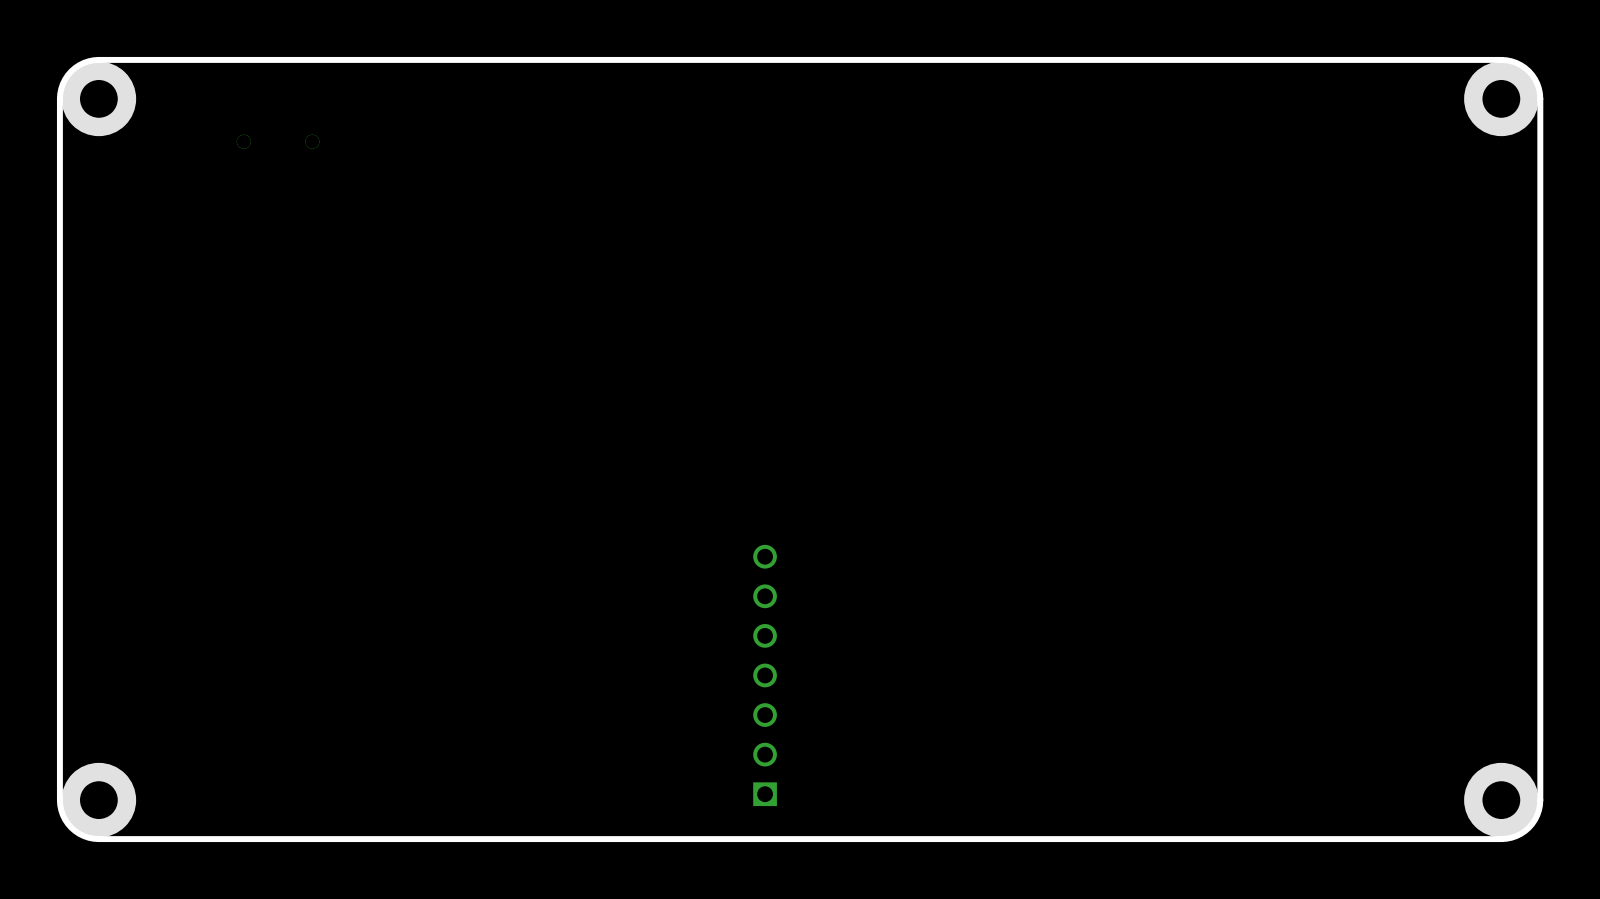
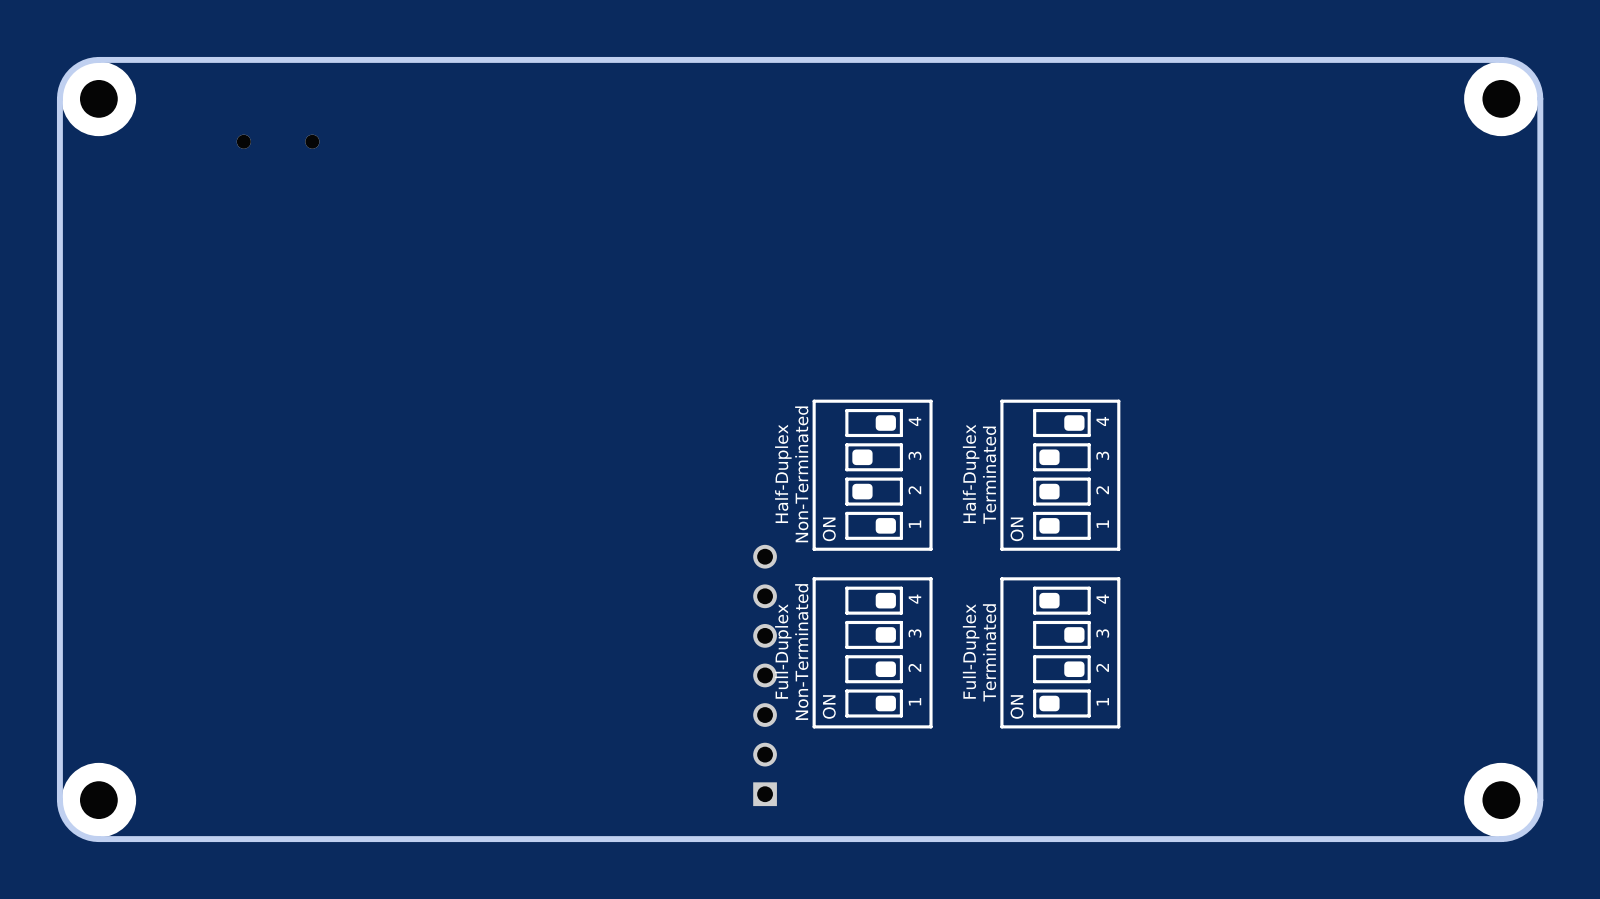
line: none -> (931, 401) (931, 549) (814, 549) (814, 401) (931, 401)
line: none -> (1118, 401) (1118, 549) (1001, 549) (1001, 401) (1118, 401)
line: none -> (901, 410) (901, 435) (846, 435) (846, 410) (901, 410)
line: none -> (1089, 410) (1089, 435) (1034, 435) (1034, 410) (1089, 410)
drawing: none -> [875, 415, 896, 431]
drawing: none -> [1064, 415, 1085, 431]
text: none -> 4 (914, 421)
text: none -> 4 (1102, 421)
line: none -> (901, 444) (901, 469) (846, 469) (846, 444) (901, 444)
line: none -> (1089, 444) (1089, 469) (1034, 469) (1034, 444) (1089, 444)
drawing: none -> [852, 449, 873, 466]
drawing: none -> [1039, 449, 1060, 466]
text: none -> 3 (914, 455)
text: none -> 3 (1102, 455)
text: none -> Half-Duplex (783, 473)
text: none -> Half-Duplex (971, 473)
text: none -> Non-Terminated (801, 474)
text: none -> Terminated (989, 475)
line: none -> (901, 479) (901, 504) (846, 504) (846, 479) (901, 479)
line: none -> (1089, 479) (1089, 504) (1034, 504) (1034, 479) (1089, 479)
drawing: none -> [852, 483, 873, 500]
drawing: none -> [1039, 483, 1060, 500]
text: none -> 2 (914, 490)
text: none -> 2 (1102, 490)
line: none -> (901, 513) (901, 538) (846, 538) (846, 513) (901, 513)
line: none -> (1089, 513) (1089, 538) (1034, 538) (1034, 513) (1089, 513)
drawing: none -> [875, 518, 896, 534]
drawing: none -> [1039, 518, 1060, 534]
text: none -> 1 (914, 524)
text: none -> 1 (1102, 524)
text: none -> ON (829, 529)
text: none -> ON (1017, 529)
line: none -> (931, 578) (814, 578) (814, 726) (931, 726) (931, 578)
line: none -> (1118, 578) (1118, 726) (1001, 726) (1001, 578) (1118, 578)
line: none -> (901, 588) (846, 588) (846, 613) (901, 613) (901, 588)
line: none -> (1089, 588) (1089, 613) (1034, 613) (1034, 588) (1089, 588)
drawing: none -> [875, 592, 896, 609]
drawing: none -> [1039, 592, 1060, 609]
text: none -> 4 (914, 599)
text: none -> 4 (1102, 599)
line: none -> (901, 622) (846, 622) (846, 647) (901, 647) (901, 622)
line: none -> (1089, 622) (1089, 647) (1034, 647) (1034, 622) (1089, 622)
drawing: none -> [875, 627, 896, 678]
drawing: none -> [1064, 627, 1085, 678]
text: none -> 3 (914, 633)
text: none -> 3 (1102, 633)
text: none -> Full-Duplex (783, 651)
text: none -> Full-Duplex (971, 651)
text: none -> Non-Terminated (801, 652)
text: none -> Terminated (989, 652)
line: none -> (901, 656) (846, 656) (846, 681) (901, 681) (901, 656)
line: none -> (1089, 656) (1089, 681) (1034, 681) (1034, 656) (1089, 656)
text: none -> 2 (914, 667)
text: none -> 2 (1102, 667)
line: none -> (901, 691) (846, 691) (846, 715) (901, 715) (901, 691)
line: none -> (1089, 691) (1089, 715) (1034, 715) (1034, 691) (1089, 691)
drawing: none -> [875, 695, 896, 712]
drawing: none -> [1039, 695, 1060, 712]
text: none -> 1 (914, 701)
text: none -> 1 (1102, 701)
text: none -> ON (829, 706)
text: none -> ON (1017, 706)

